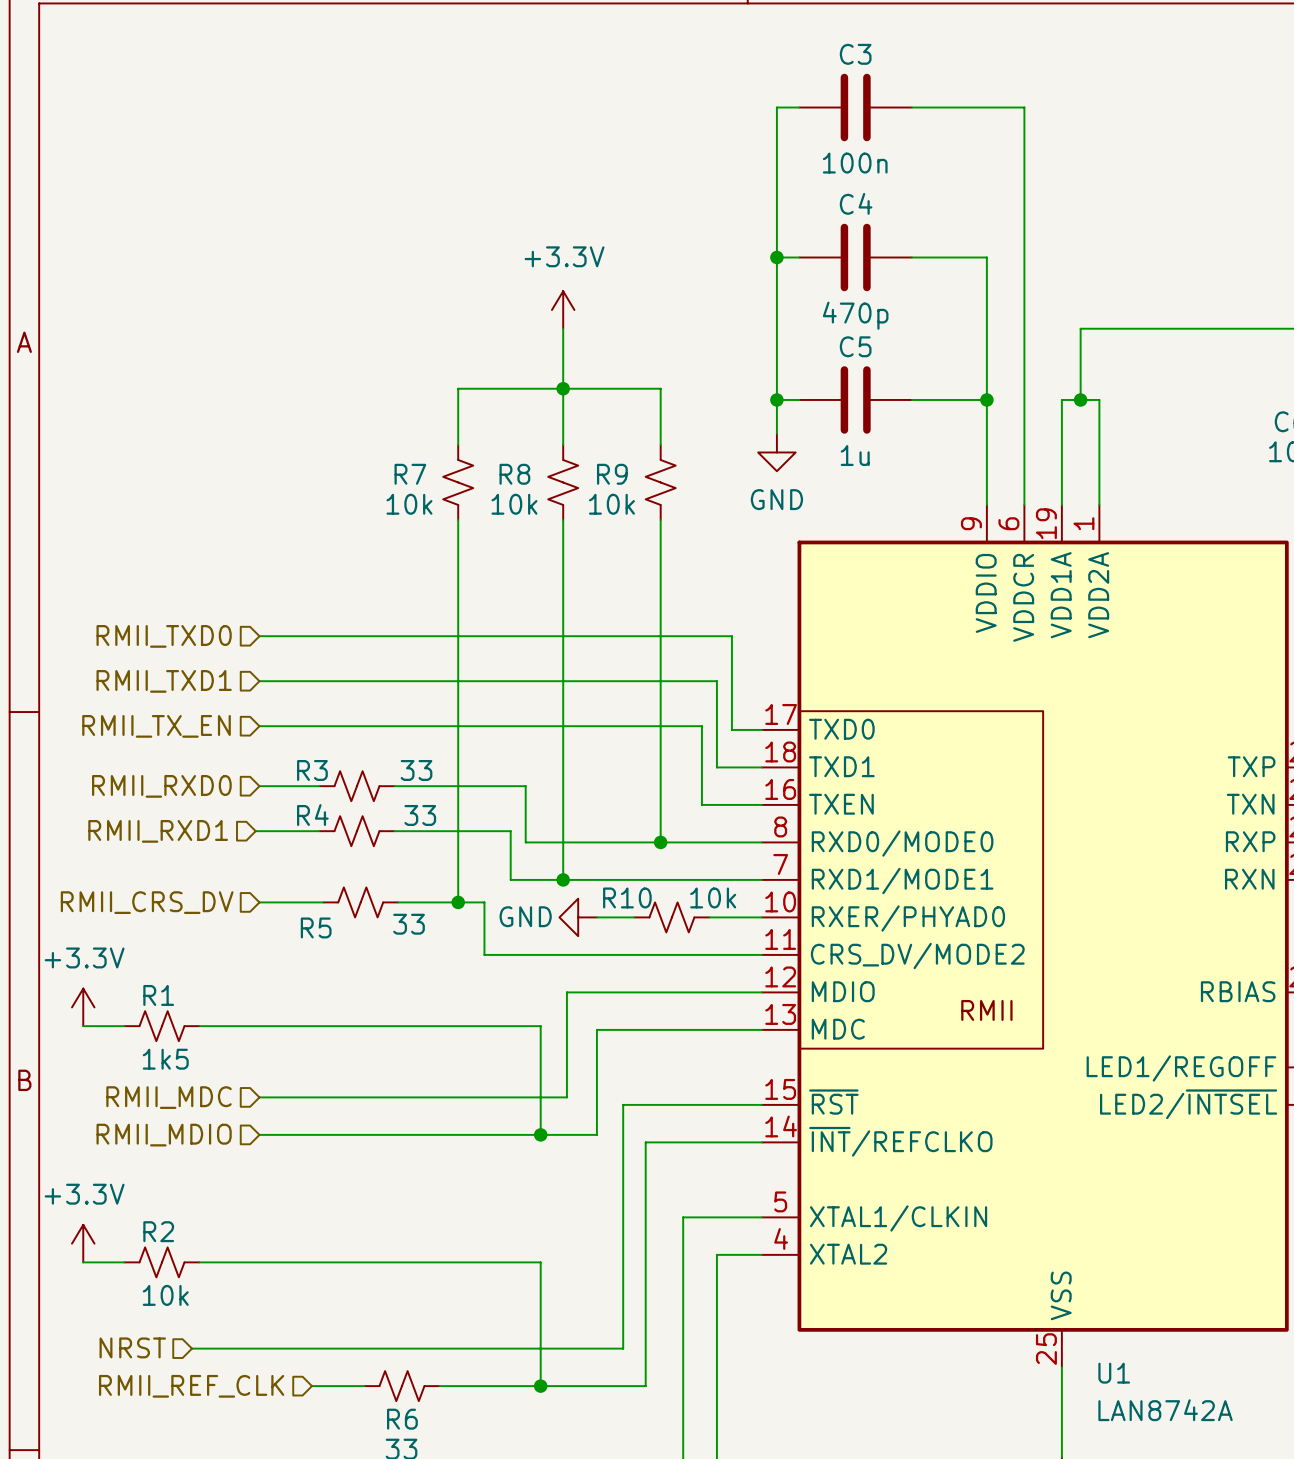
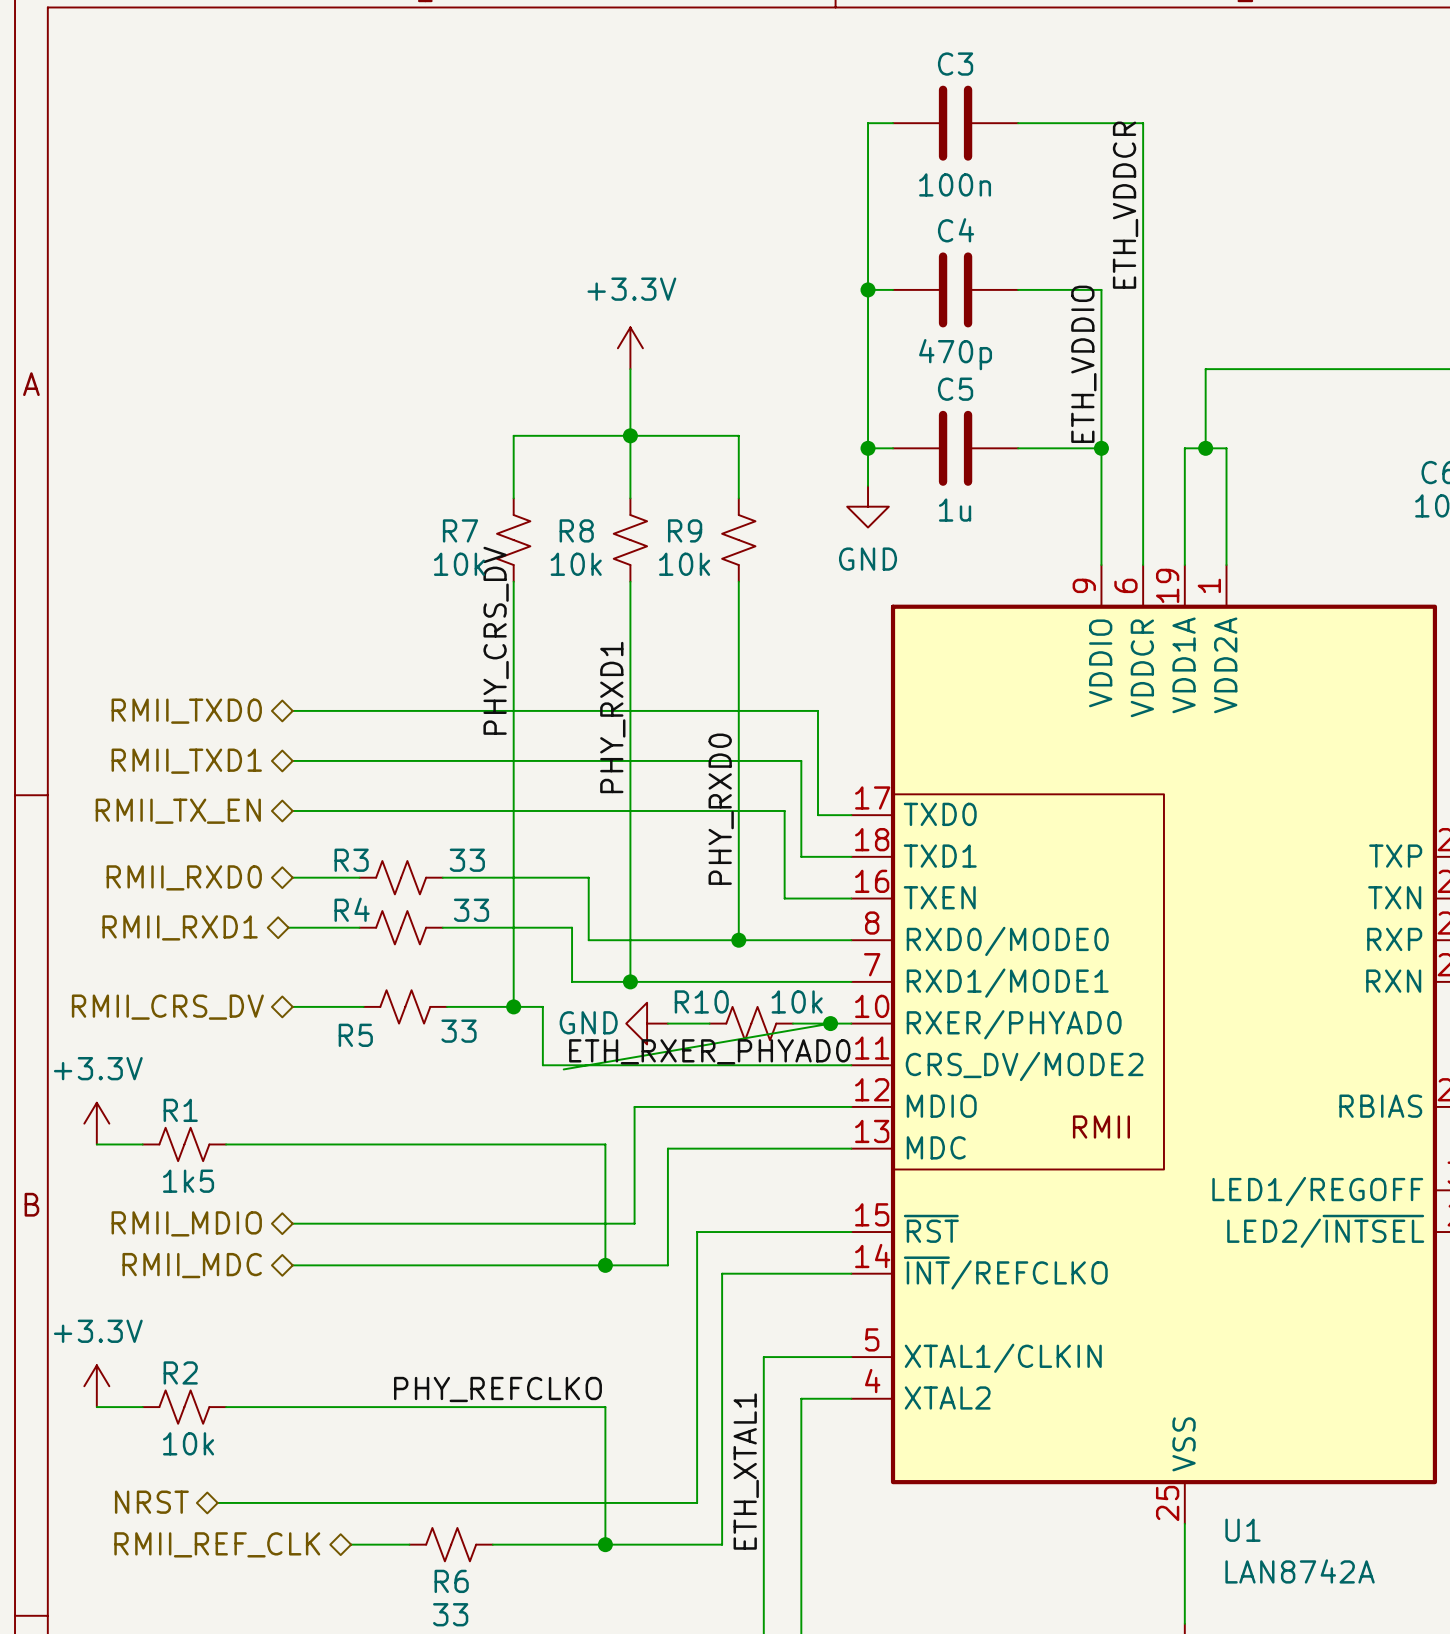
label: none -> ETH_VDDCR (1125, 205)
label: none -> ETH_VDDIO (1083, 364)
label: none -> PHY_CRS_DV (496, 640)
hierarchical label shape: input (164, 636) -> bidirectional (186, 711)
label: none -> PHY_RXD1 (612, 717)
hierarchical label shape: input (164, 681) -> bidirectional (186, 761)
label: none -> PHY_RXD0 (721, 809)
hierarchical label shape: input (156, 726) -> bidirectional (178, 811)
hierarchical label shape: input (161, 786) -> bidirectional (184, 877)
hierarchical label shape: input (158, 831) -> bidirectional (180, 927)
hierarchical label shape: input (147, 902) -> bidirectional (167, 1007)
wire: none -> (830, 1023) (563, 1069)
junction: none -> (830, 1023)
label: none -> ETH_RXER_PHYAD0 (709, 1051)
hierarchical label shape: input (169, 1097) -> bidirectional (186, 1223)
hierarchical label: RMII_MDC (169, 1097) -> RMII_MDIO (186, 1223)
hierarchical label shape: input (164, 1135) -> bidirectional (192, 1265)
hierarchical label: RMII_MDIO (164, 1135) -> RMII_MDC (192, 1265)
label: none -> PHY_REFCLKO (497, 1389)
label: none -> ETH_XTAL1 (746, 1471)
hierarchical label shape: input (132, 1347) -> bidirectional (151, 1502)
hierarchical label shape: input (191, 1386) -> bidirectional (217, 1544)

